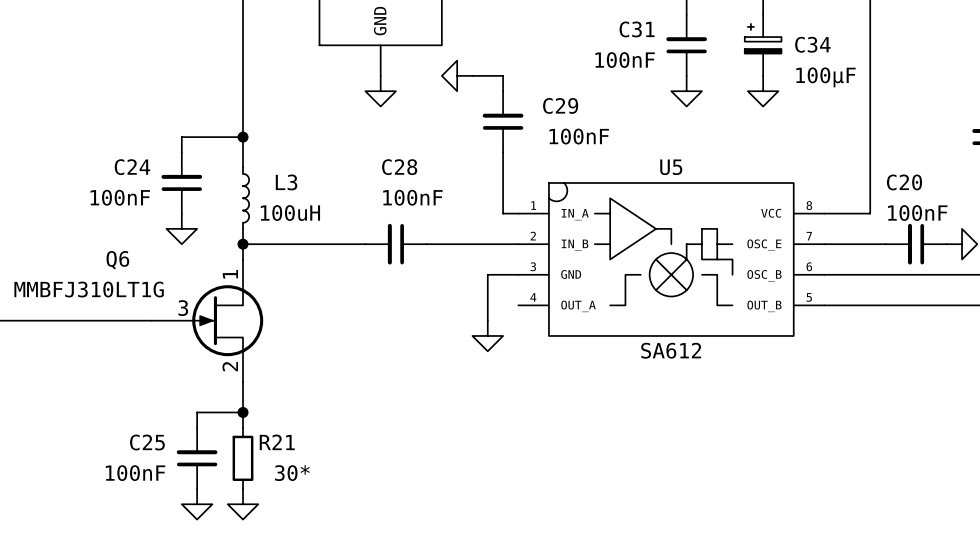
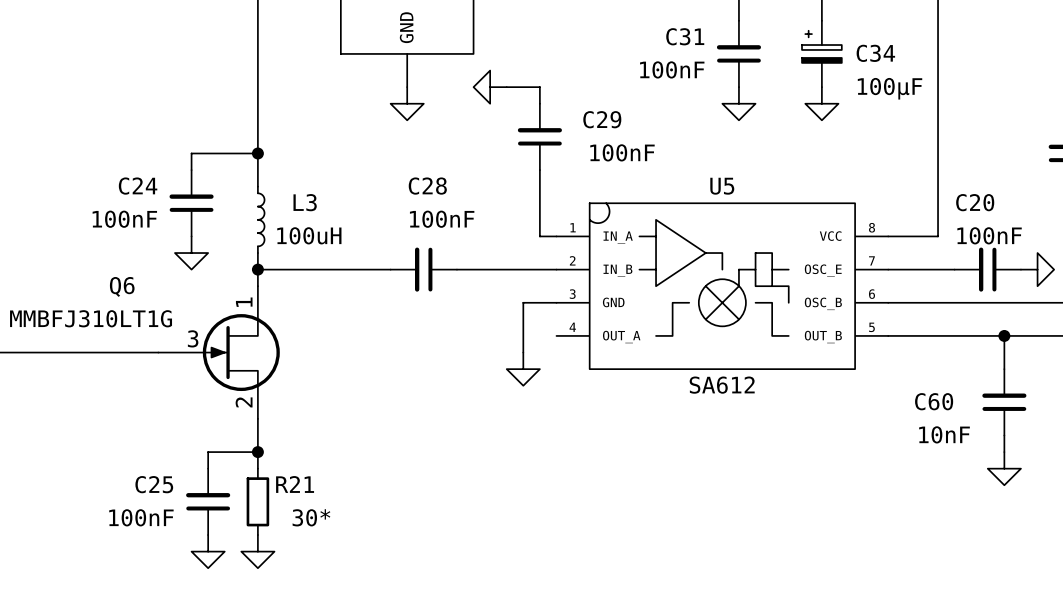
wire: none -> (1004, 335) (1004, 369)
junction: none -> (1004, 335)
C60: none -> 10nF (1004, 402)
wire: none -> (1004, 435) (1004, 452)
power symbol: none -> (1004, 468)

